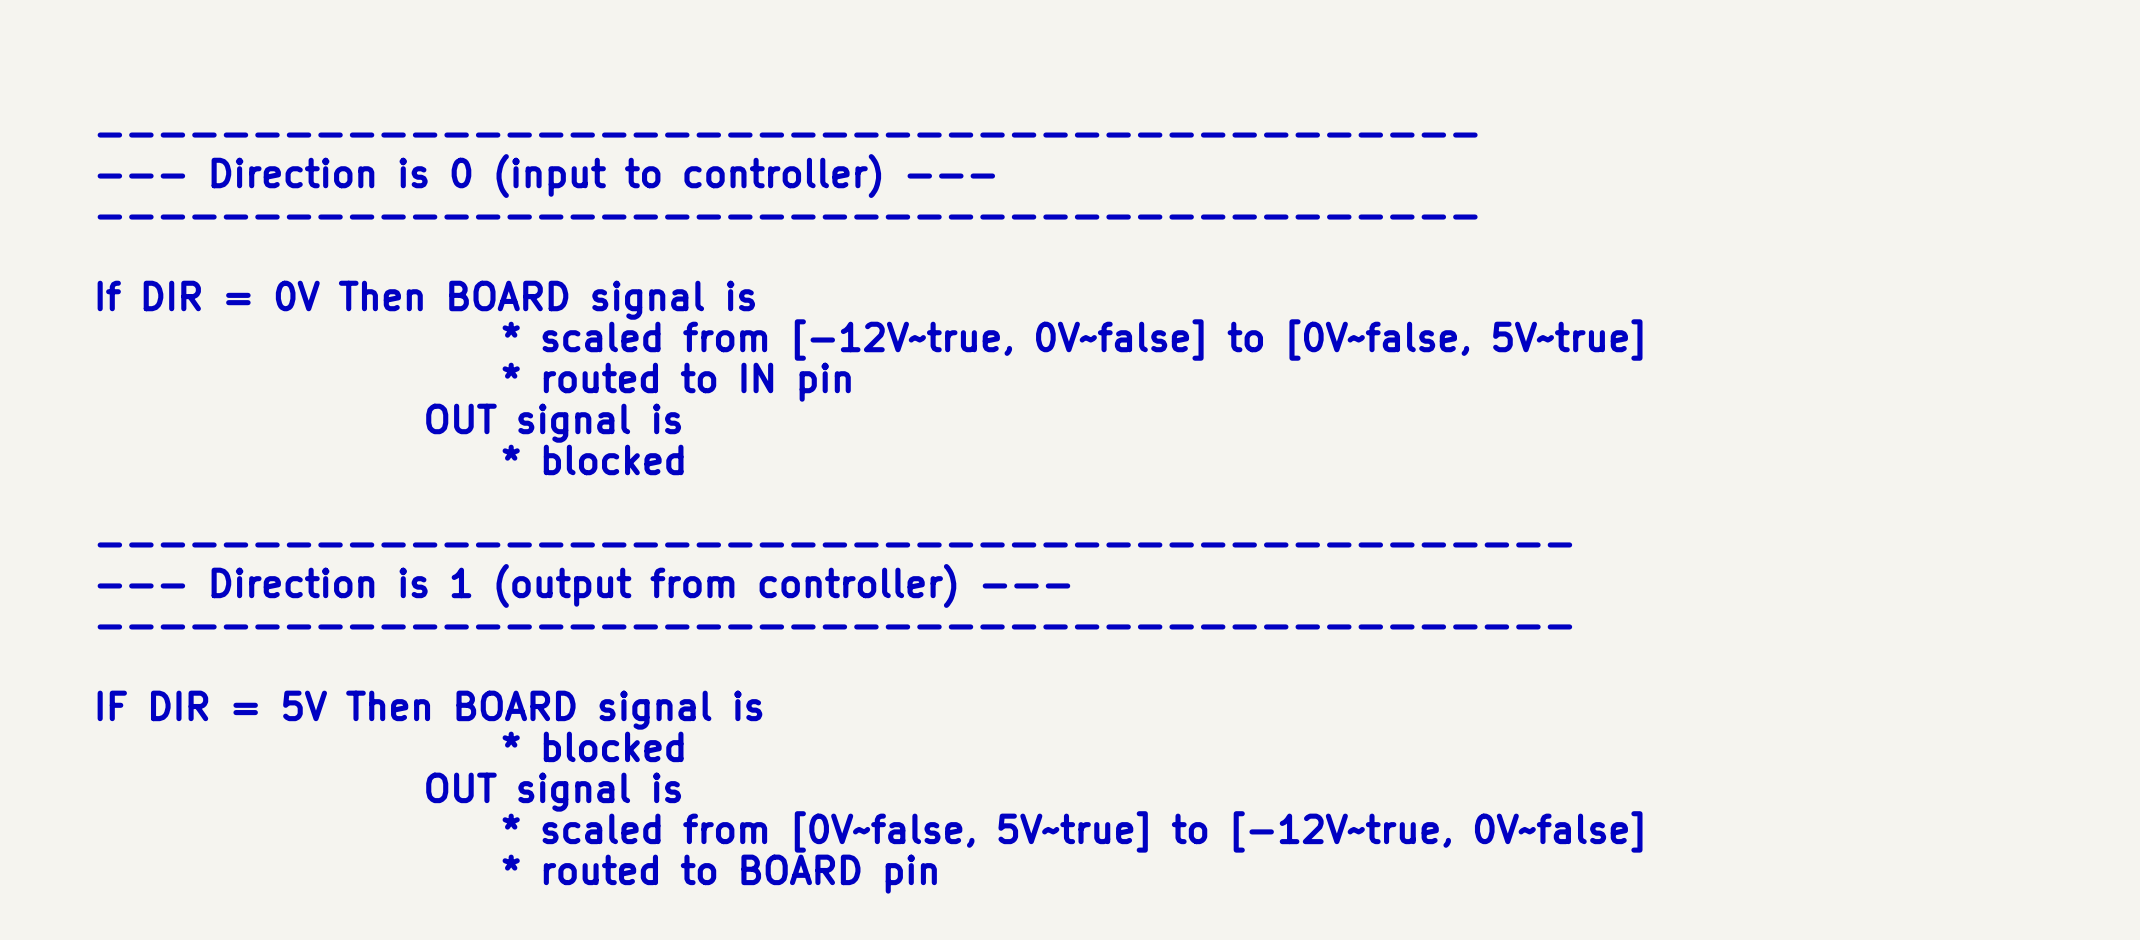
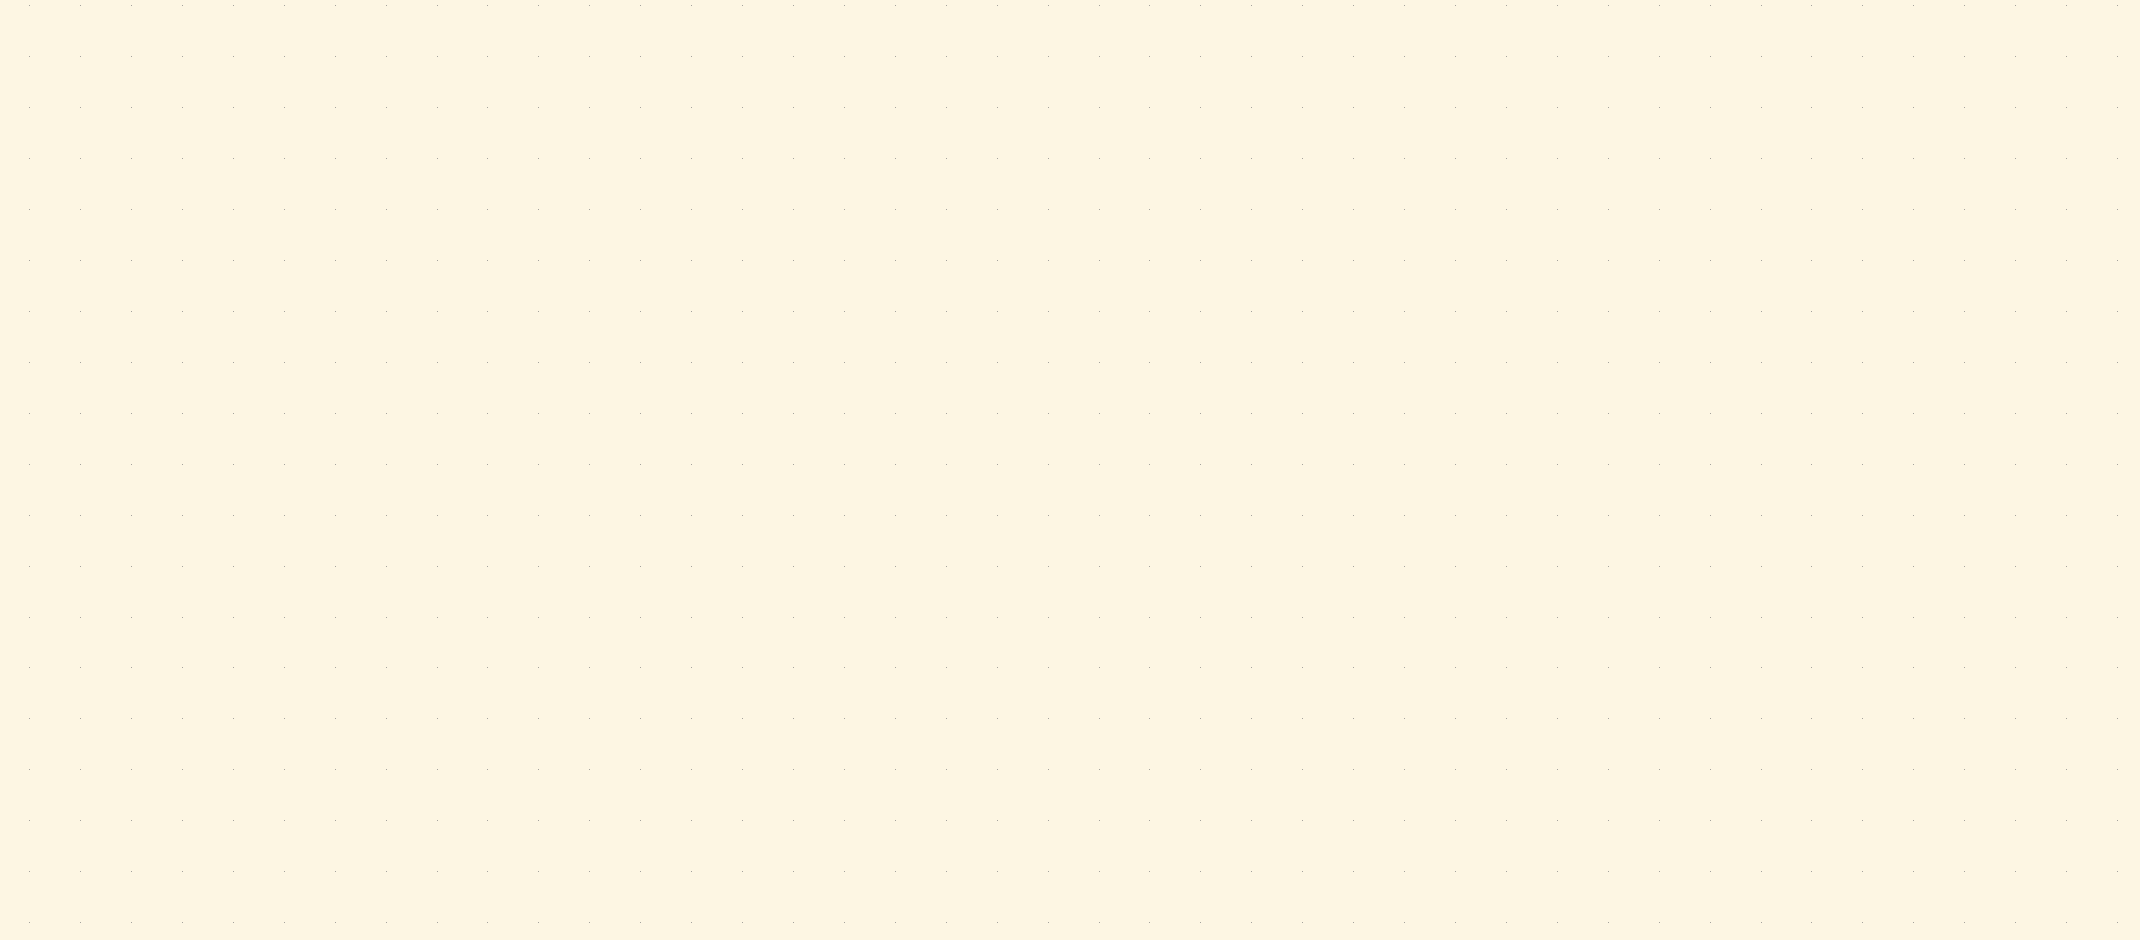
text: -------------------------------------------- (787, 135) -> none
text: --- Direction is 0 (input to controller) --- (546, 176) -> none
text: -------------------------------------------- (787, 217) -> none
text: If DIR = 0V Then BOARD signal is (426, 300) -> none
text: * scaled from [-12V~true, 0V~false] to [0V~false, 5V~true] (1072, 340) -> none
text: * routed to IN pin (676, 382) -> none
text: OUT signal is (553, 423) -> none
text: * blocked (593, 459) -> none
text: ----------------------------------------------- (834, 544) -> none
text: --- Direction is 1 (output from controller) --- (583, 585) -> none
text: ----------------------------------------------- (834, 626) -> none
text: IF DIR = 5V Then BOARD signal is (429, 710) -> none
text: * blocked (593, 746) -> none
text: OUT signal is (553, 792) -> none
text: * scaled from [0V~false, 5V~true] to [-12V~true, 0V~false] (1072, 831) -> none
text: * routed to BOARD pin (719, 874) -> none

